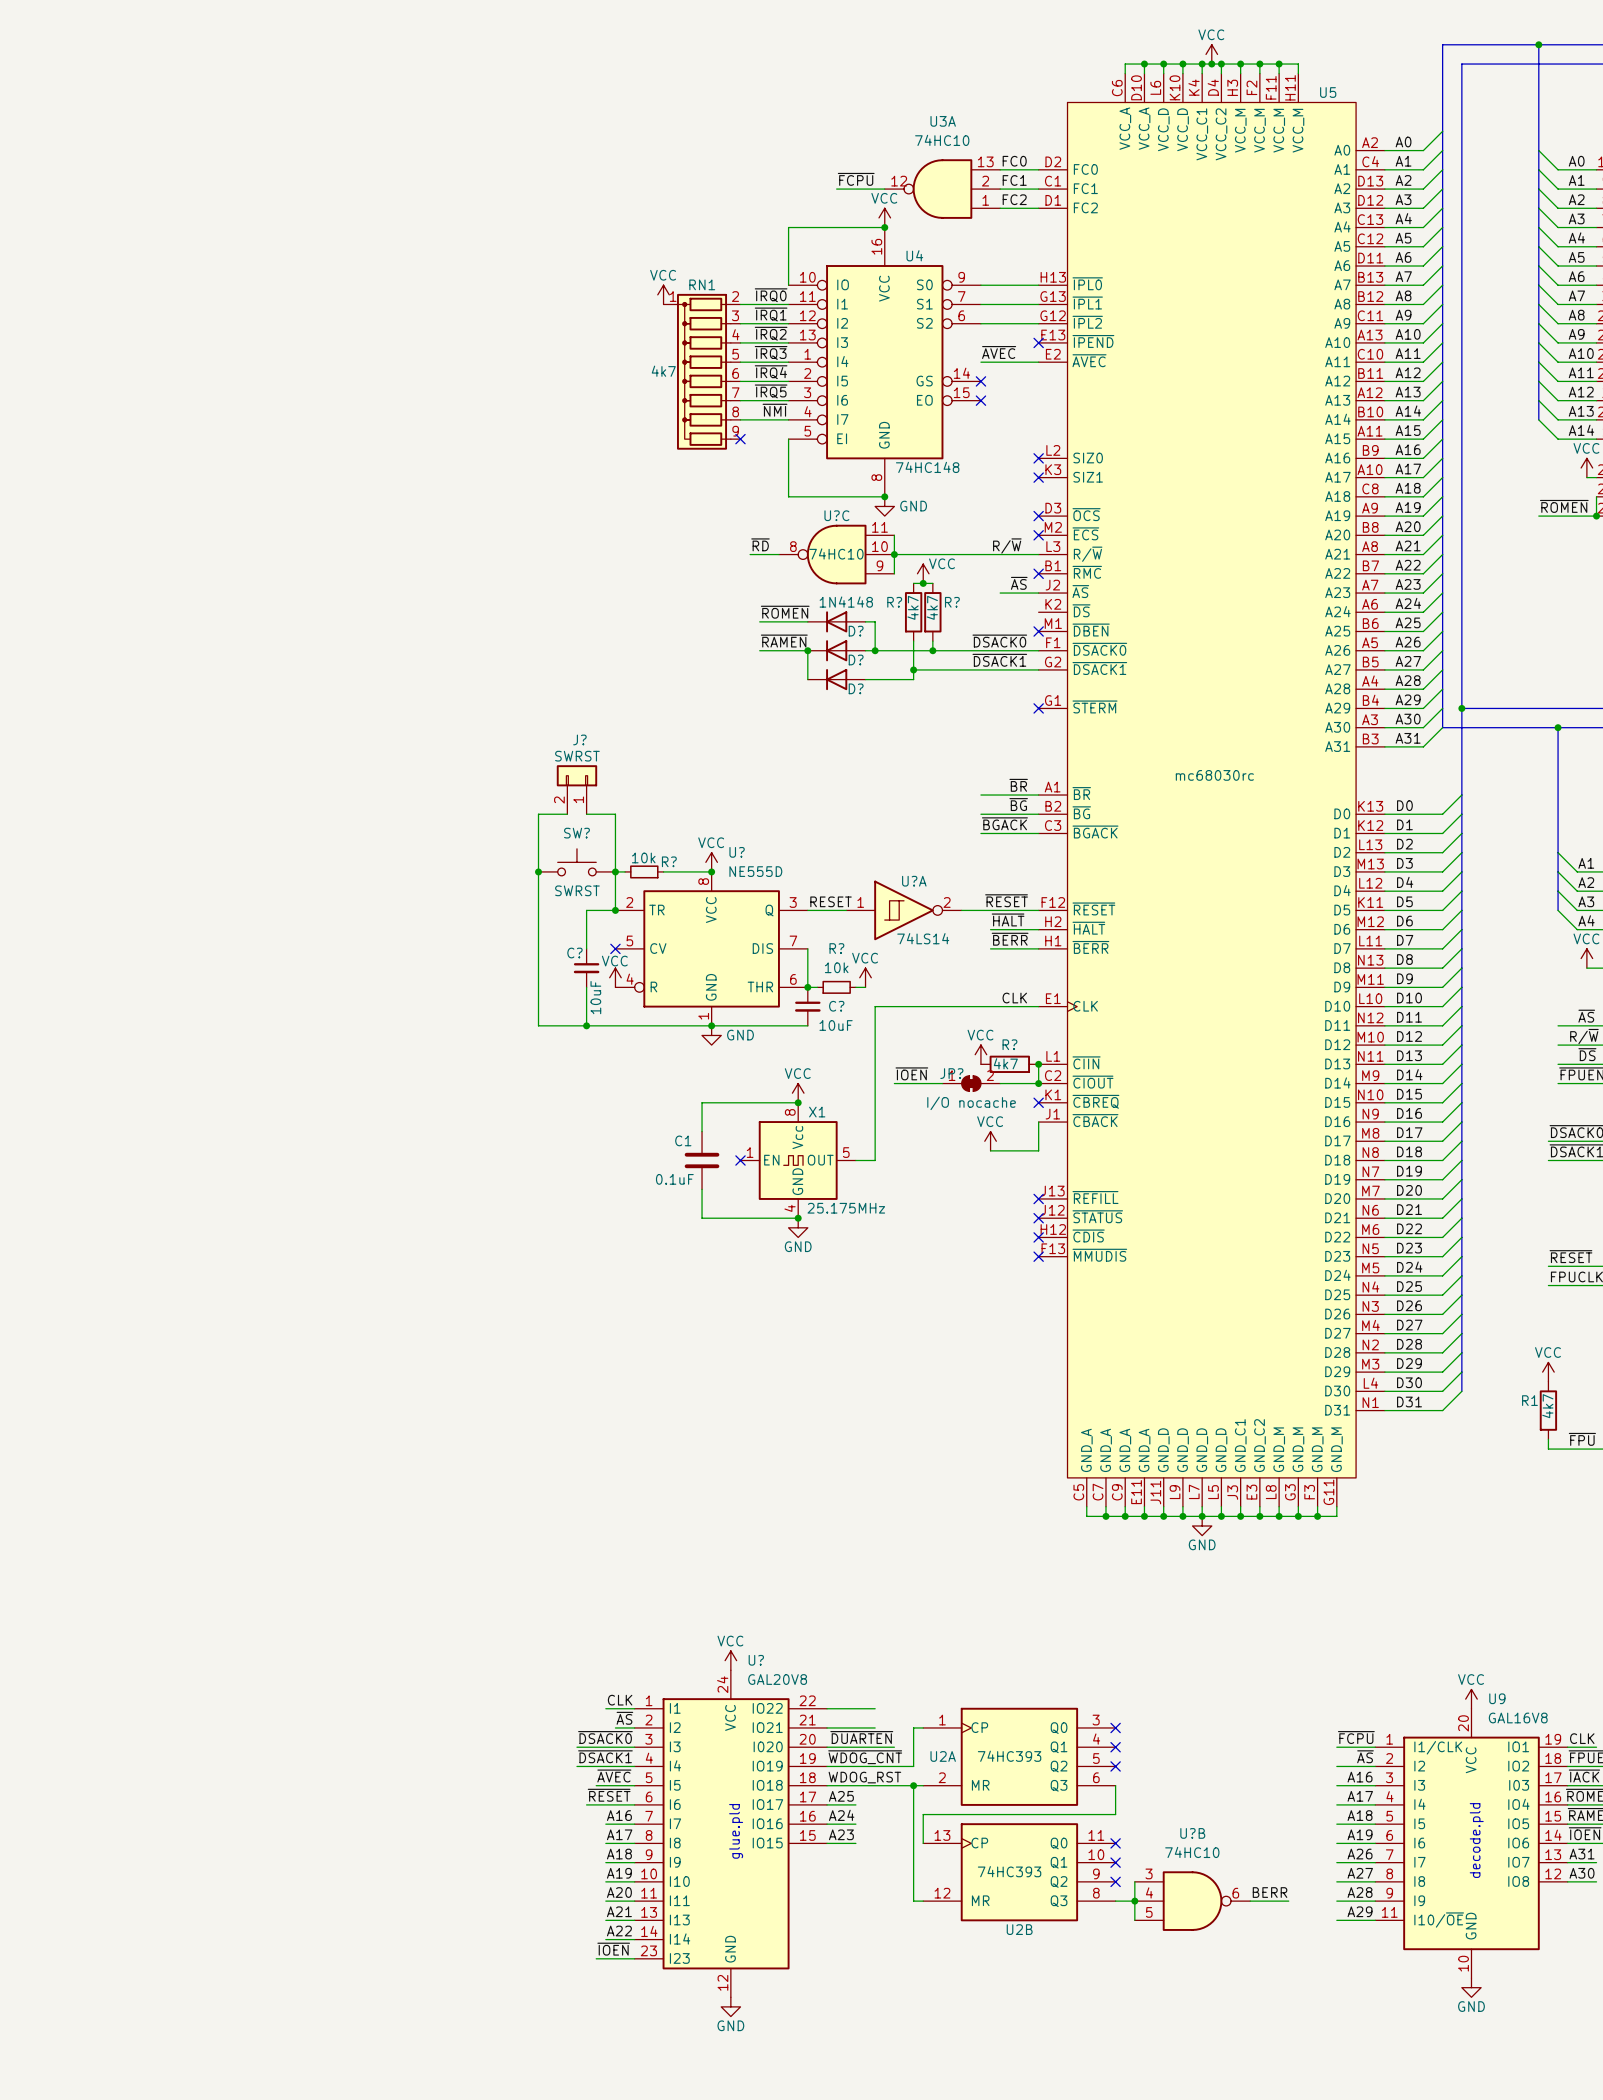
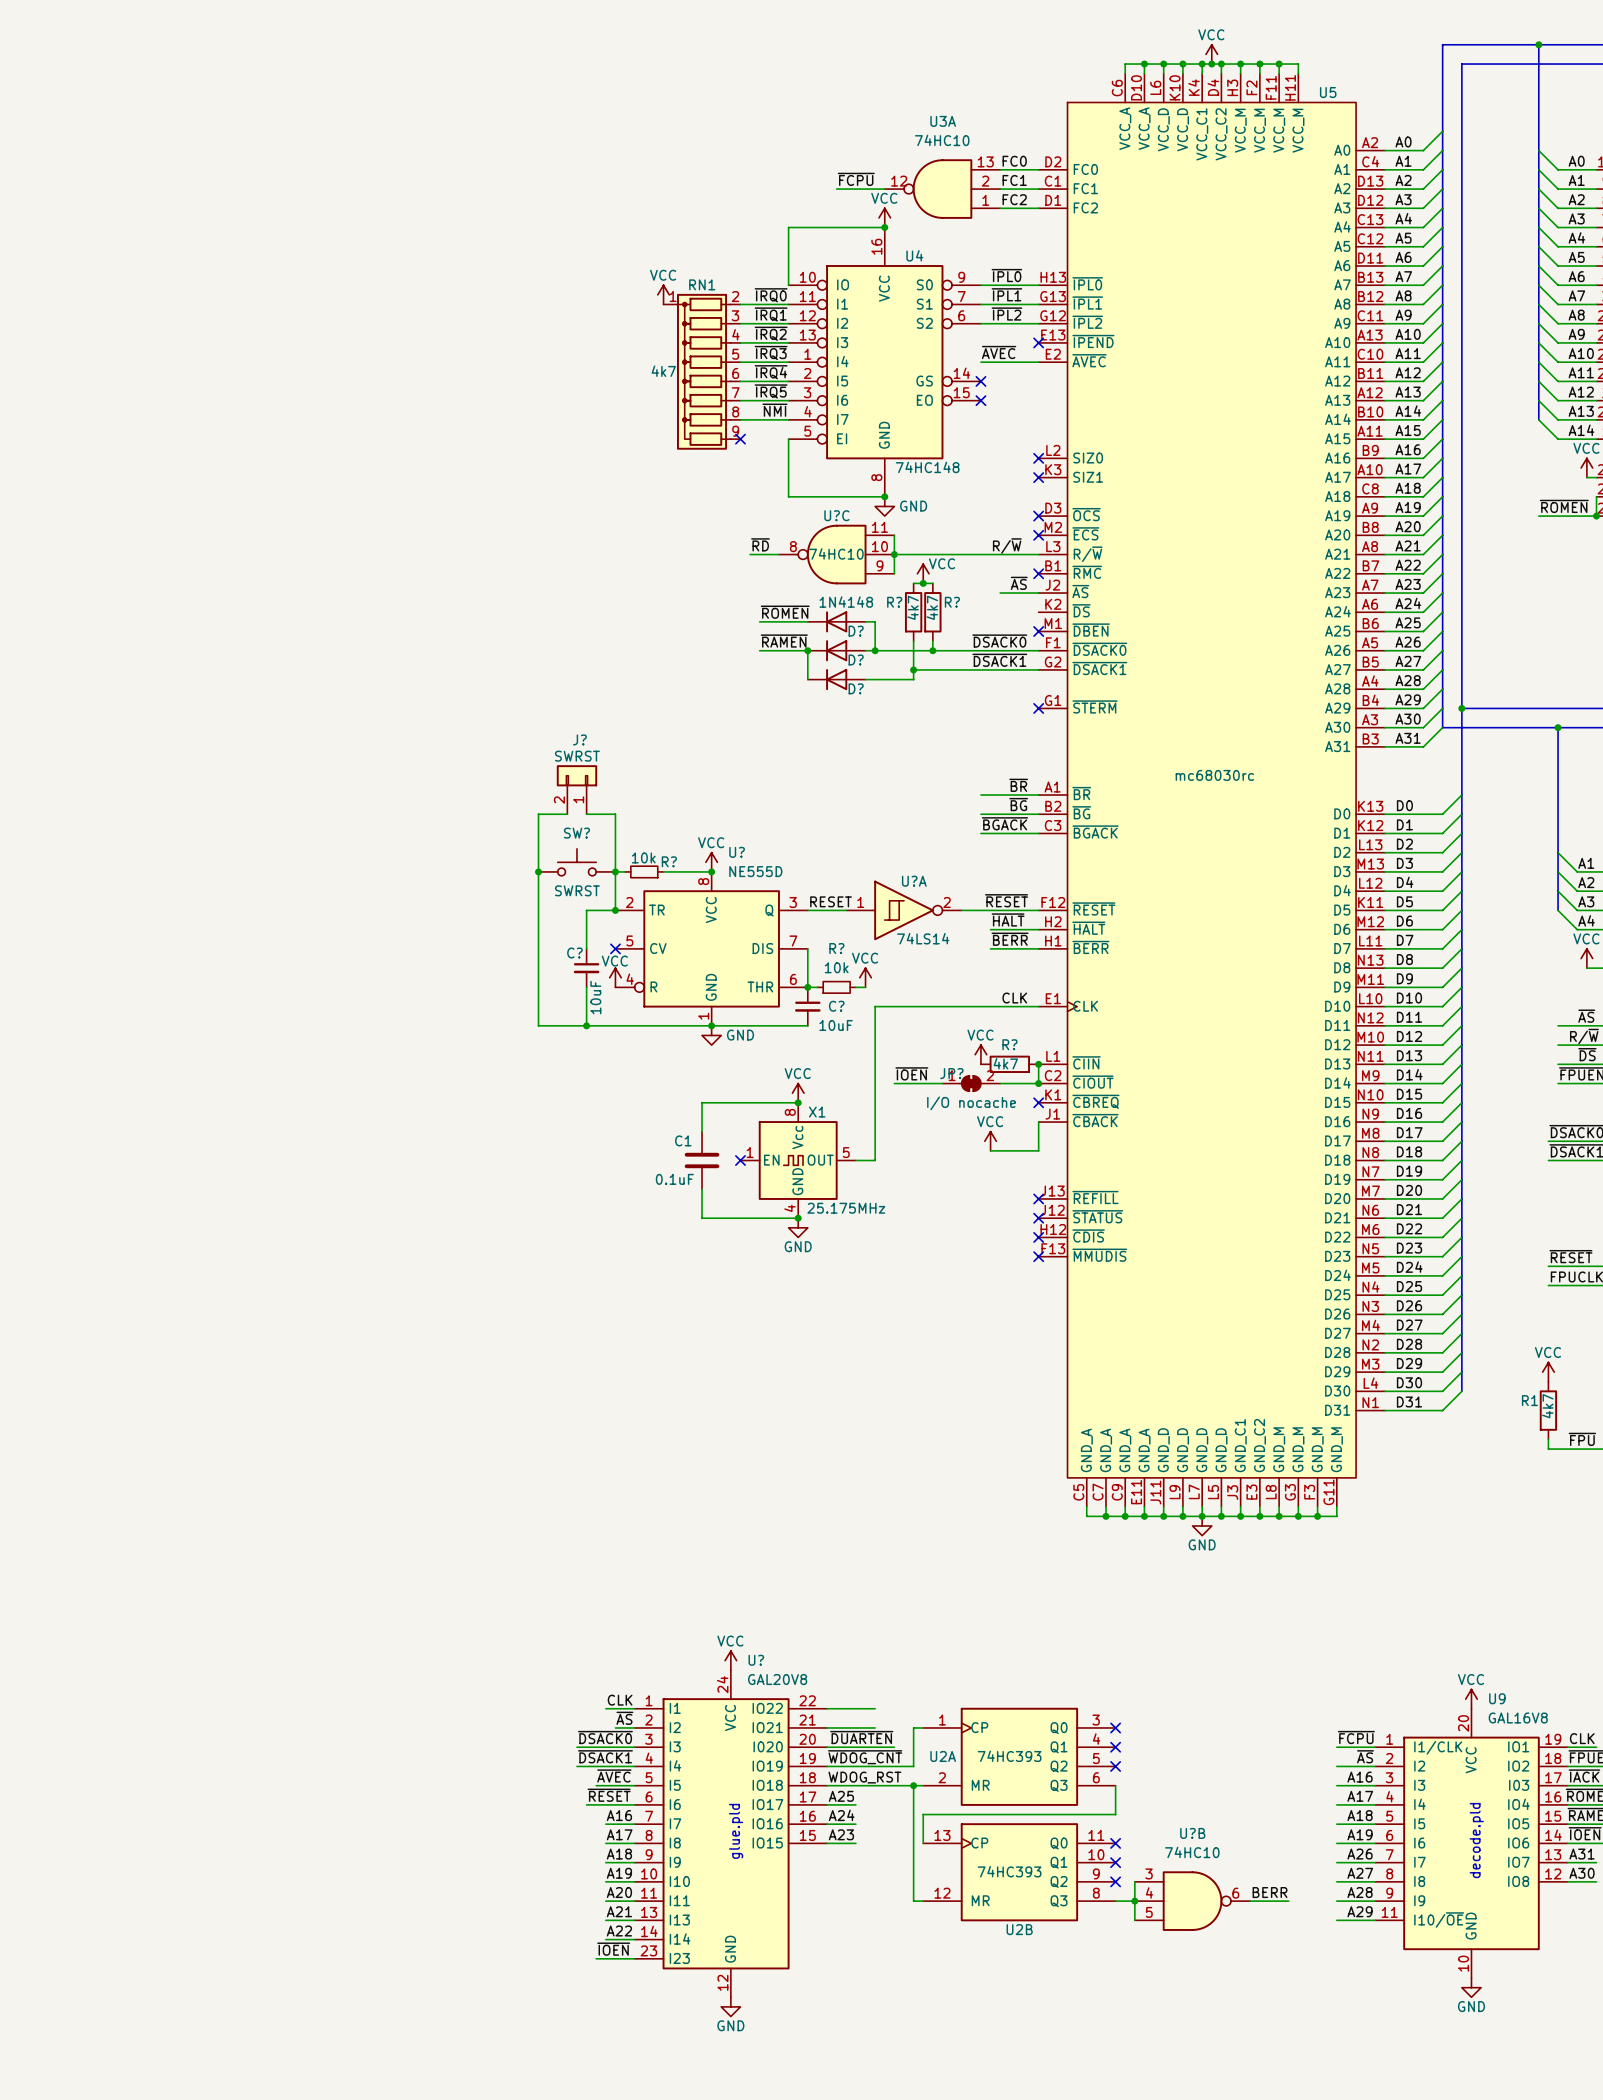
label: none -> ~{IPL0} (1006, 275)
label: none -> ~{IPL1} (1006, 294)
label: none -> ~{IPL2} (1006, 314)

